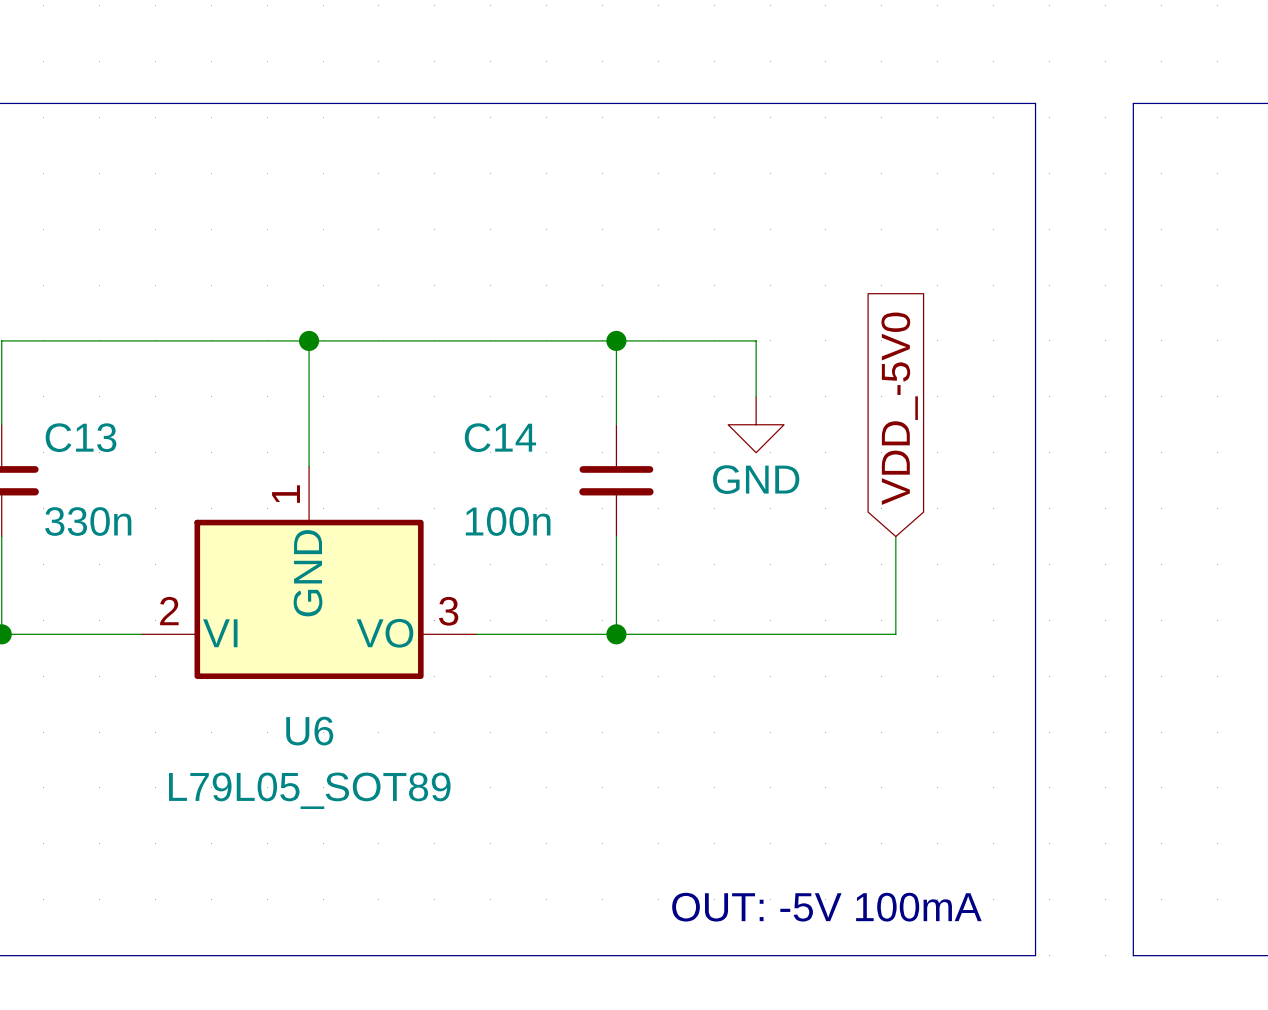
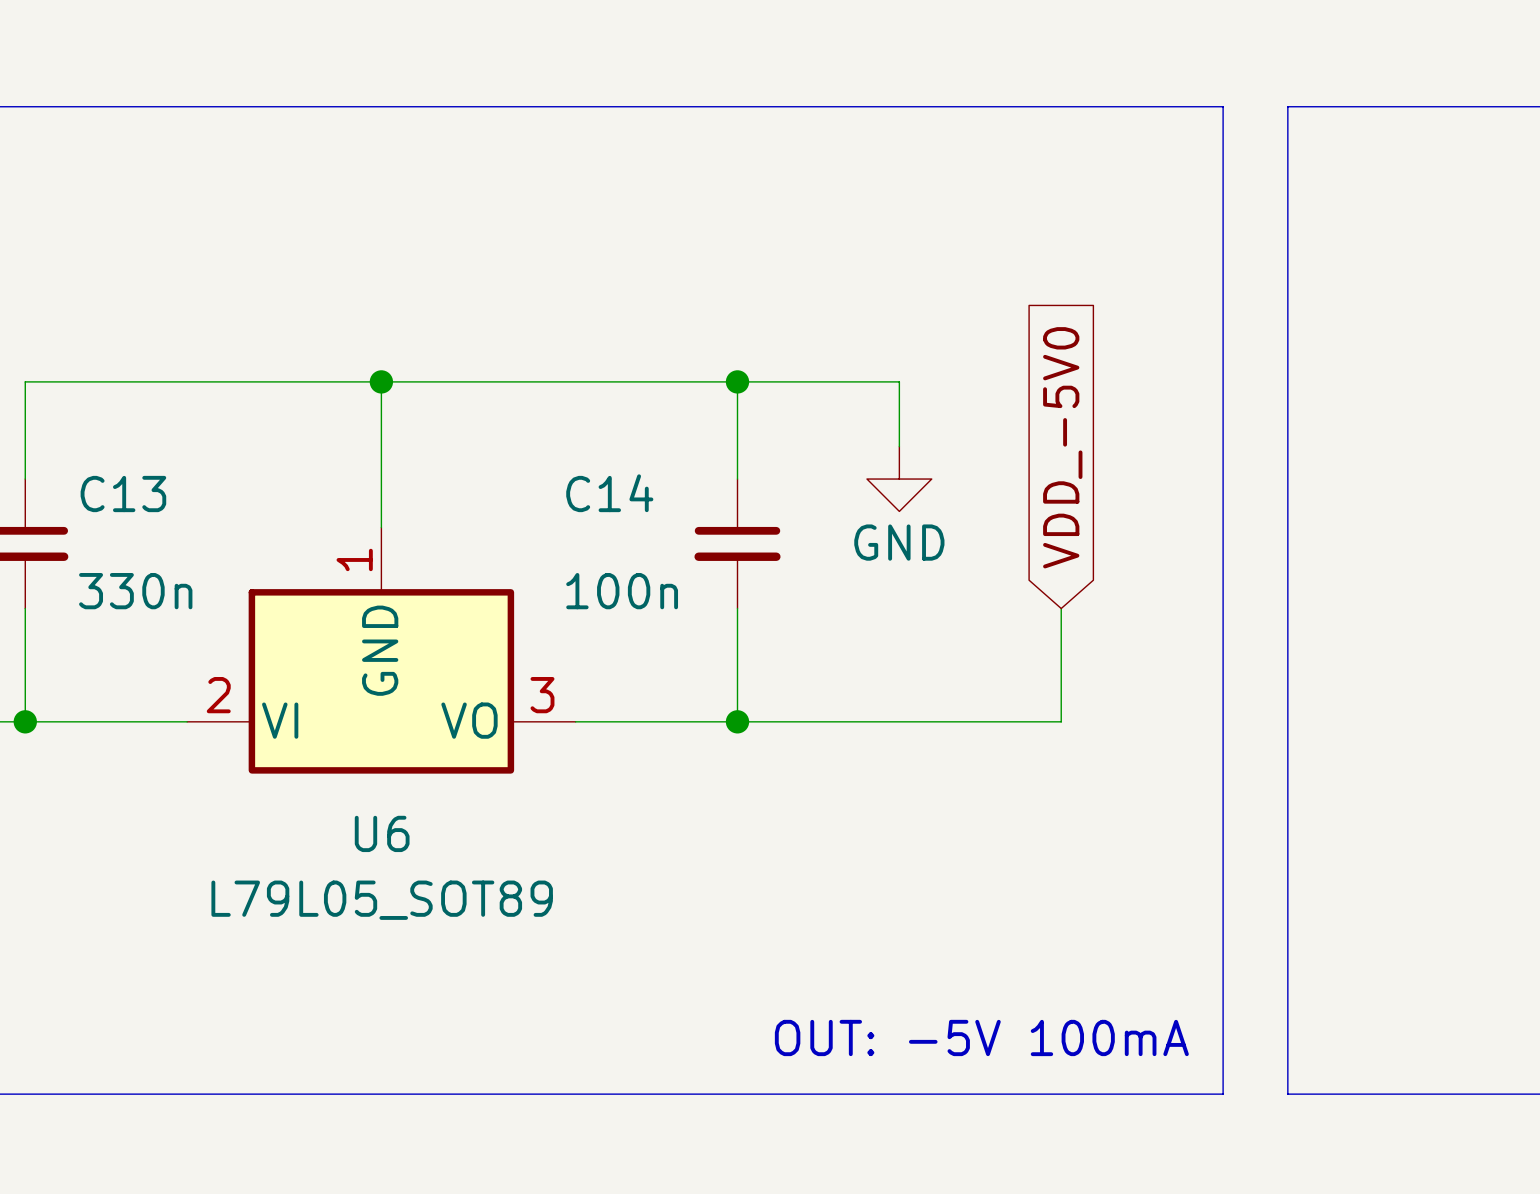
line: (1133, 103) (1133, 955) -> (1336, 106) (1287, 106) (1287, 1094) (1336, 1094)

